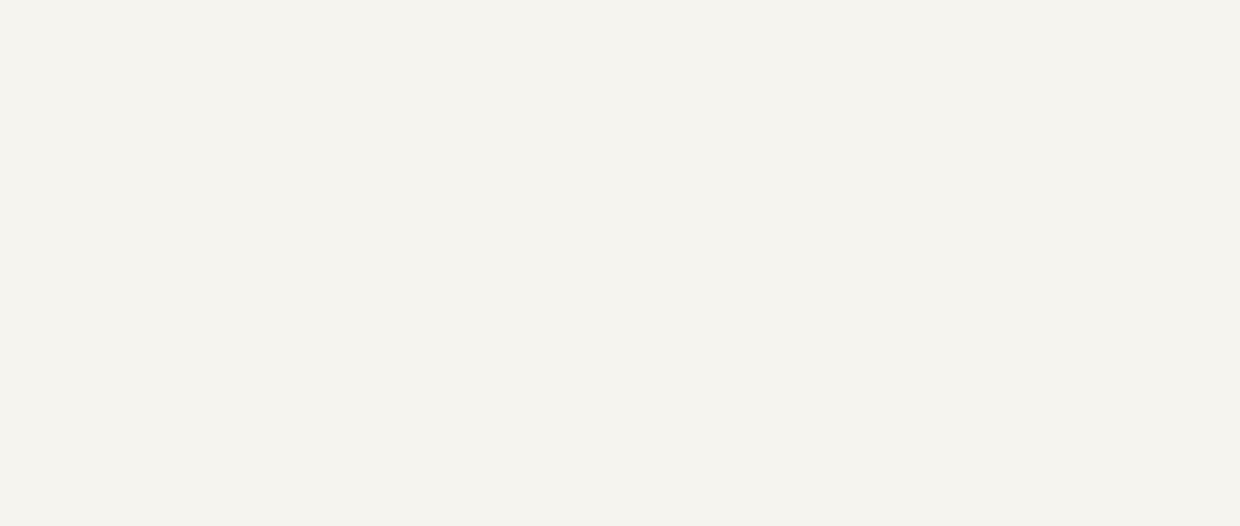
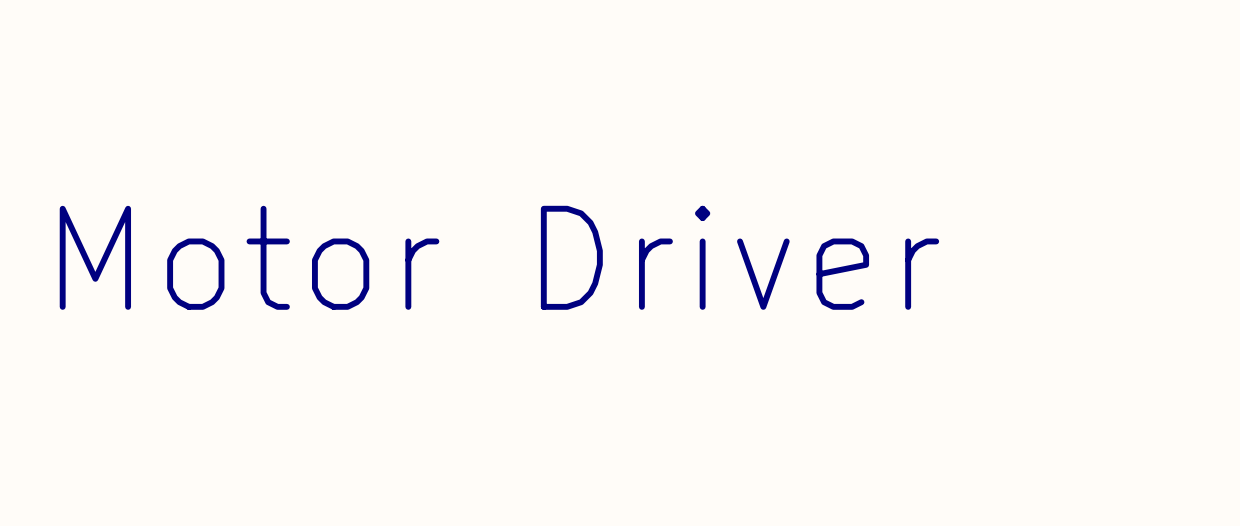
text: none -> Motor Driver (499, 257)

